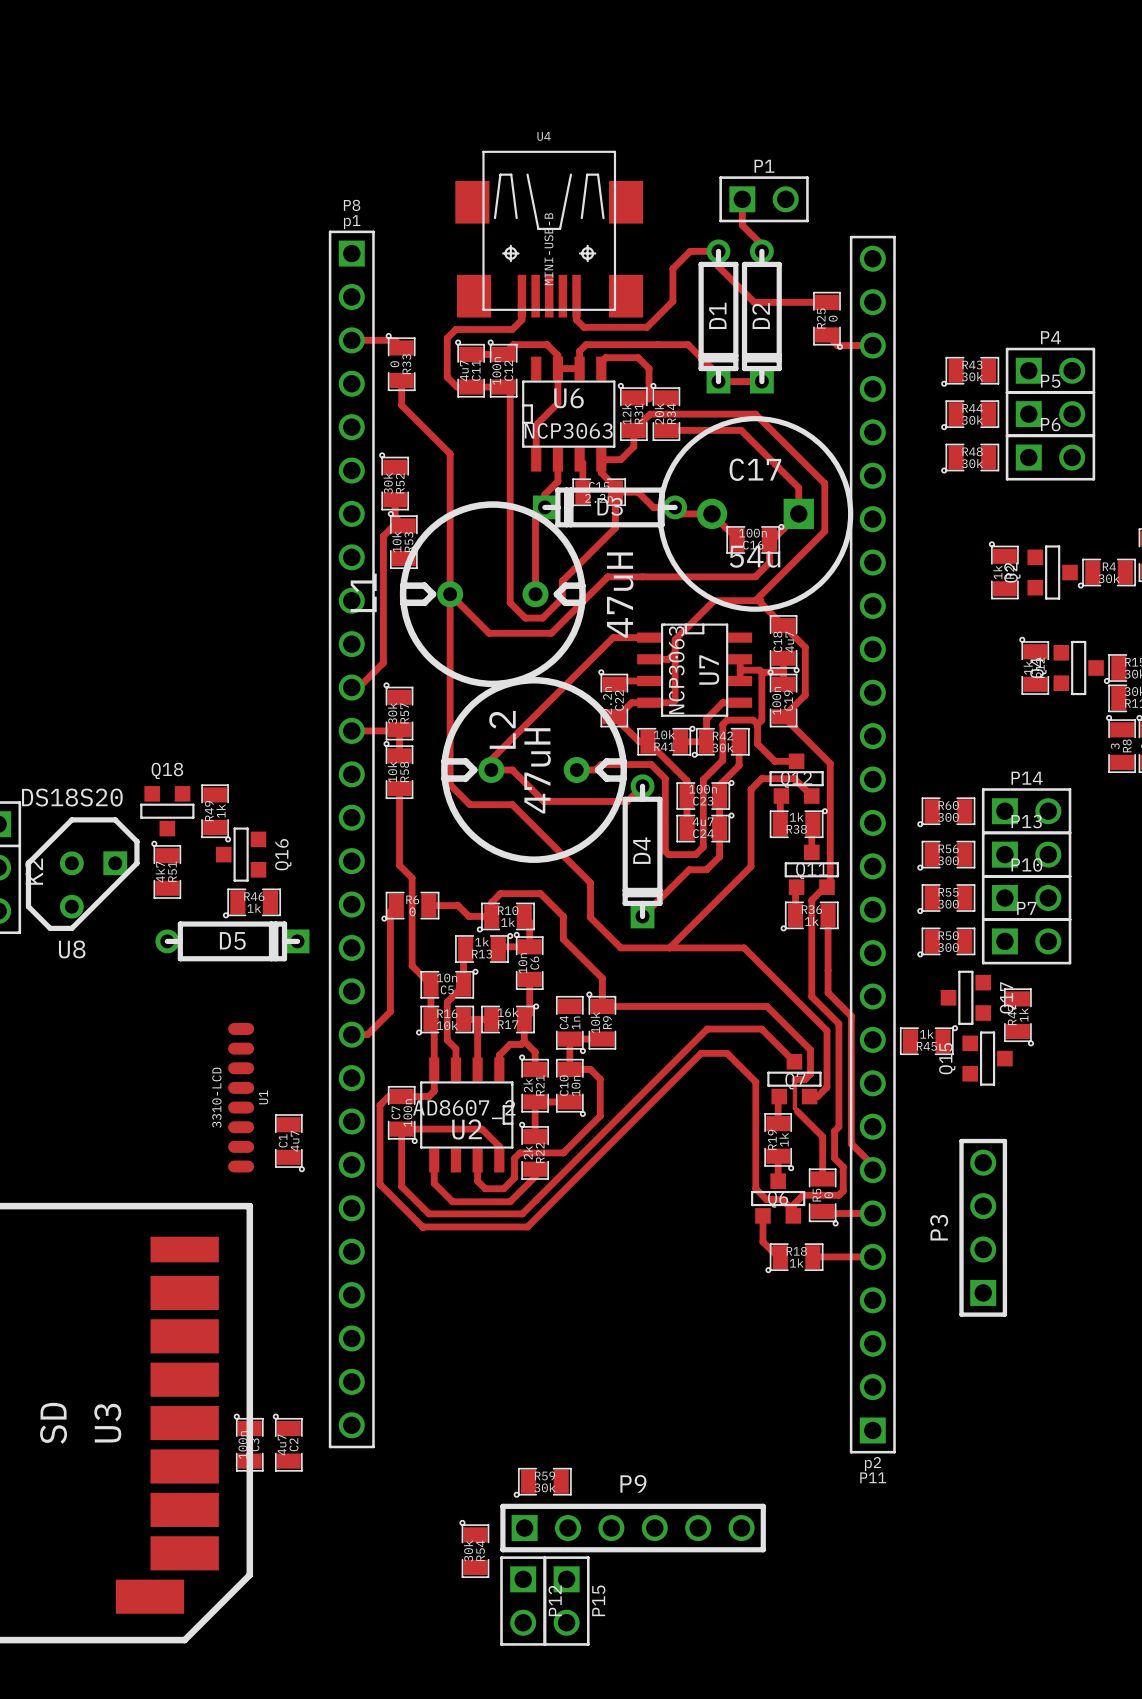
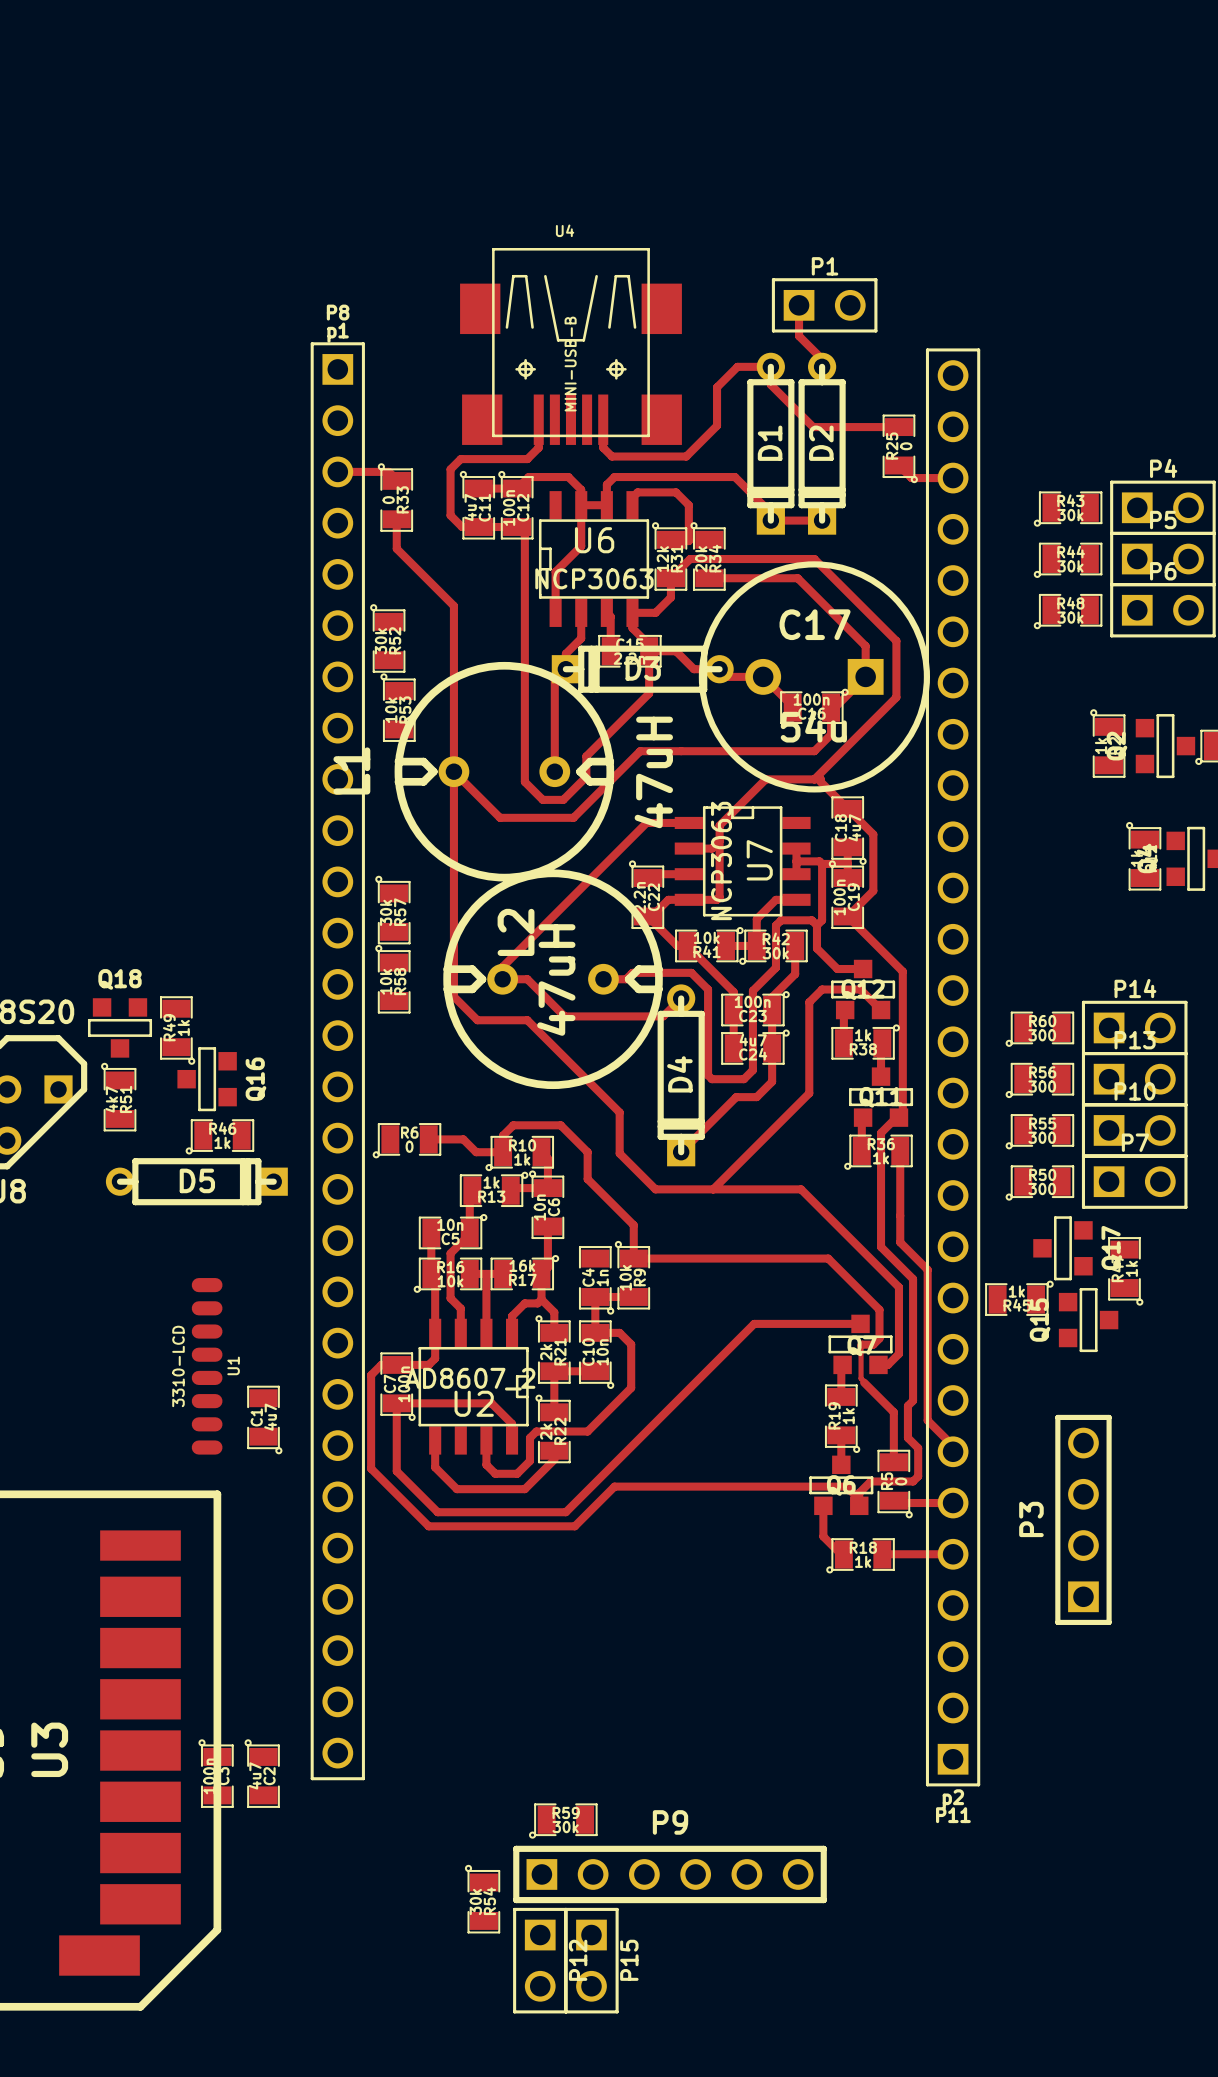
top track: (395, 499) (395, 517) (403, 525) (393, 525) (383, 536) (383, 662) (358, 687) (351, 687) -> none
top track: (351, 730) (399, 729) (399, 755) -> none
top track: (399, 788) (399, 865) (412, 878) (412, 965) (430, 984) -> none
top track: (396, 905) (390, 911) (390, 1011) (367, 1034) (351, 1034) -> none
top track: (794, 1061) (761, 1029) (707, 1029) (522, 1213) (429, 1213) -> (860, 1323) (754, 1323) (565, 1512) (437, 1512) (429, 1503)
top track: (766, 1199) (755, 1188) (755, 1082) (727, 1053) (701, 1053) (527, 1226) (422, 1227) -> (827, 1486) (614, 1486) (574, 1526) (428, 1526) (421, 1519)

